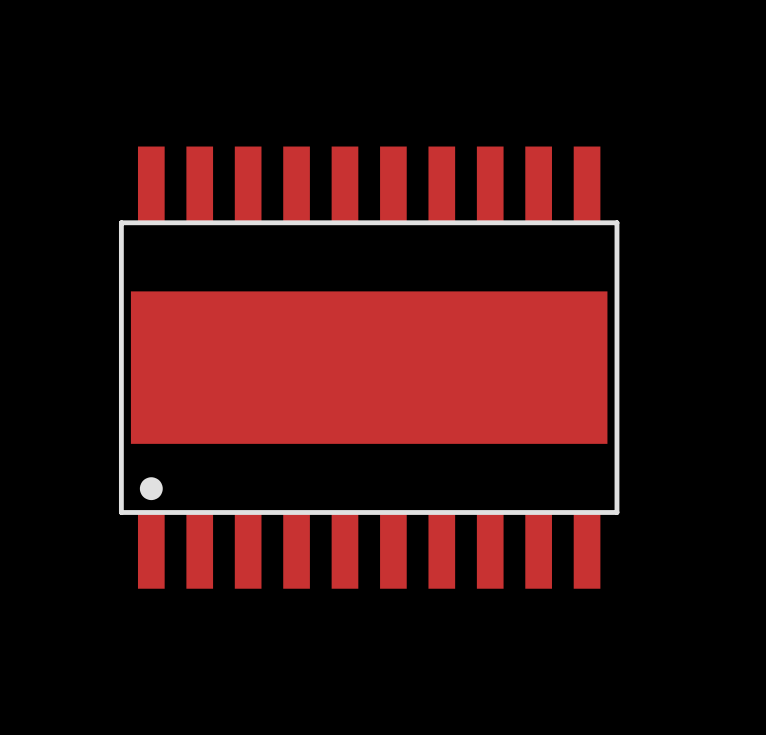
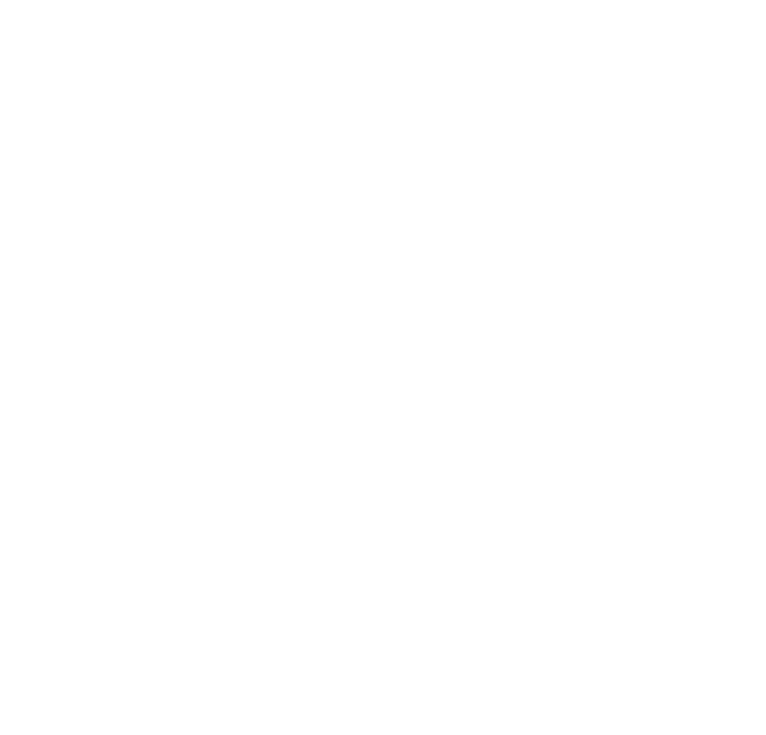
part: (369, 367) -> none

